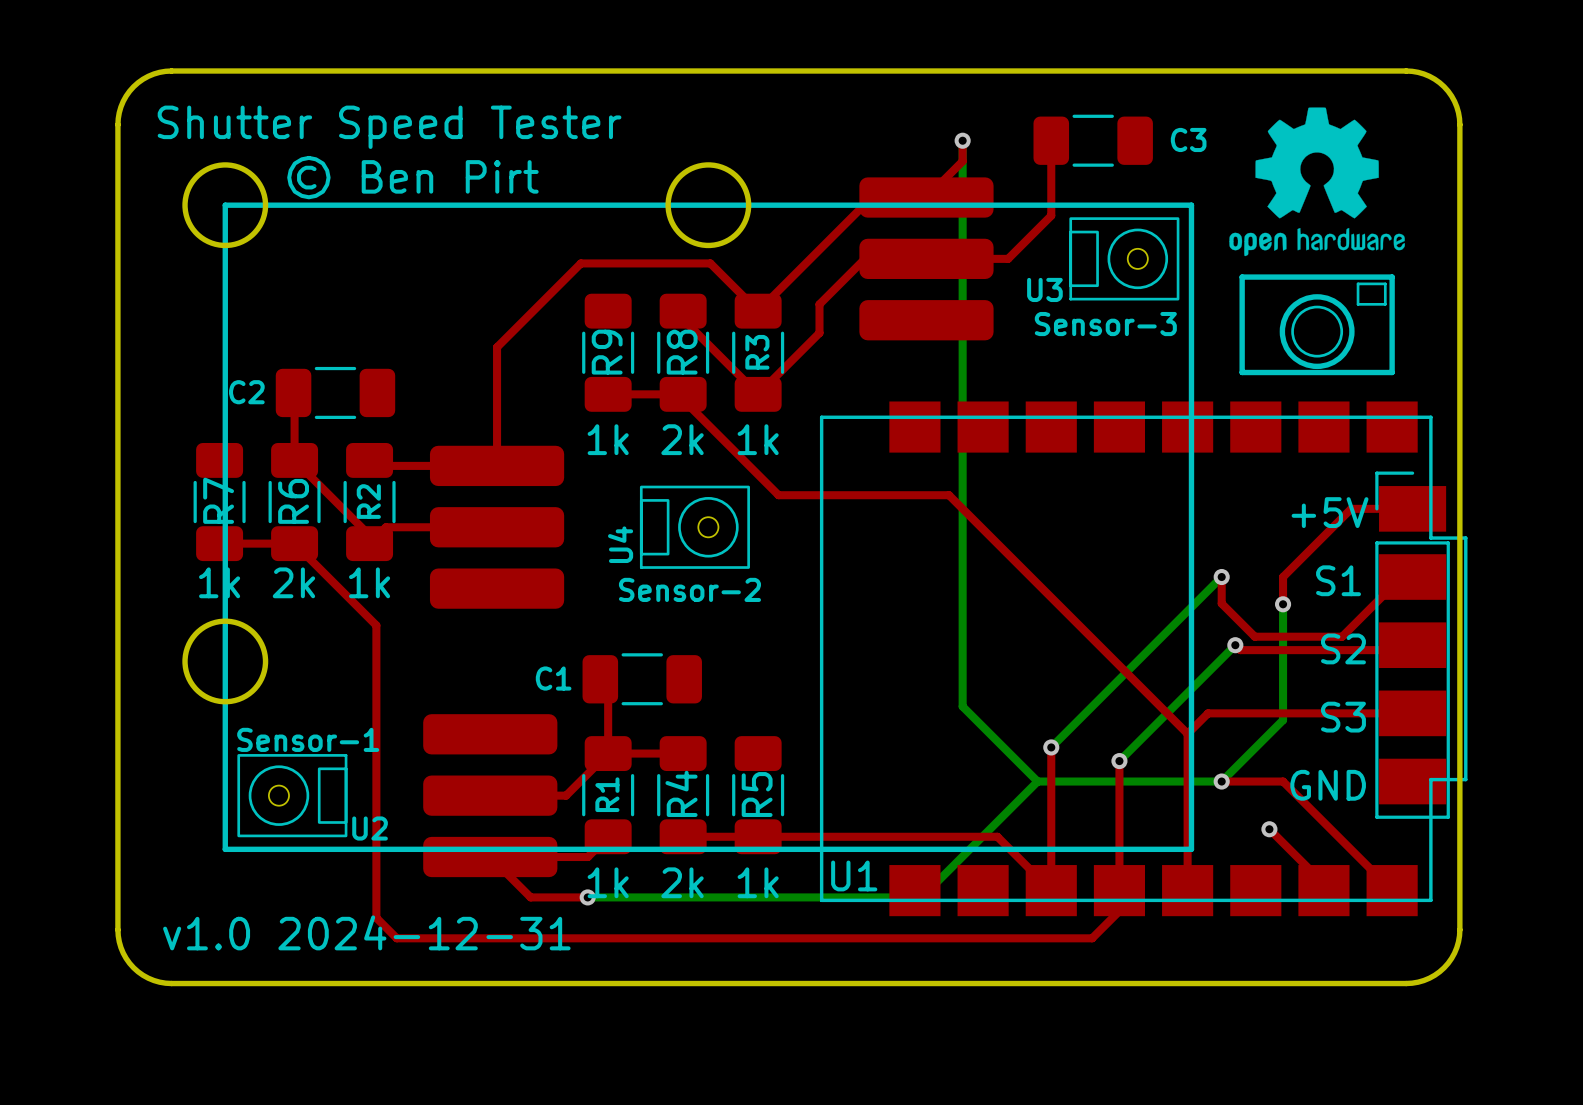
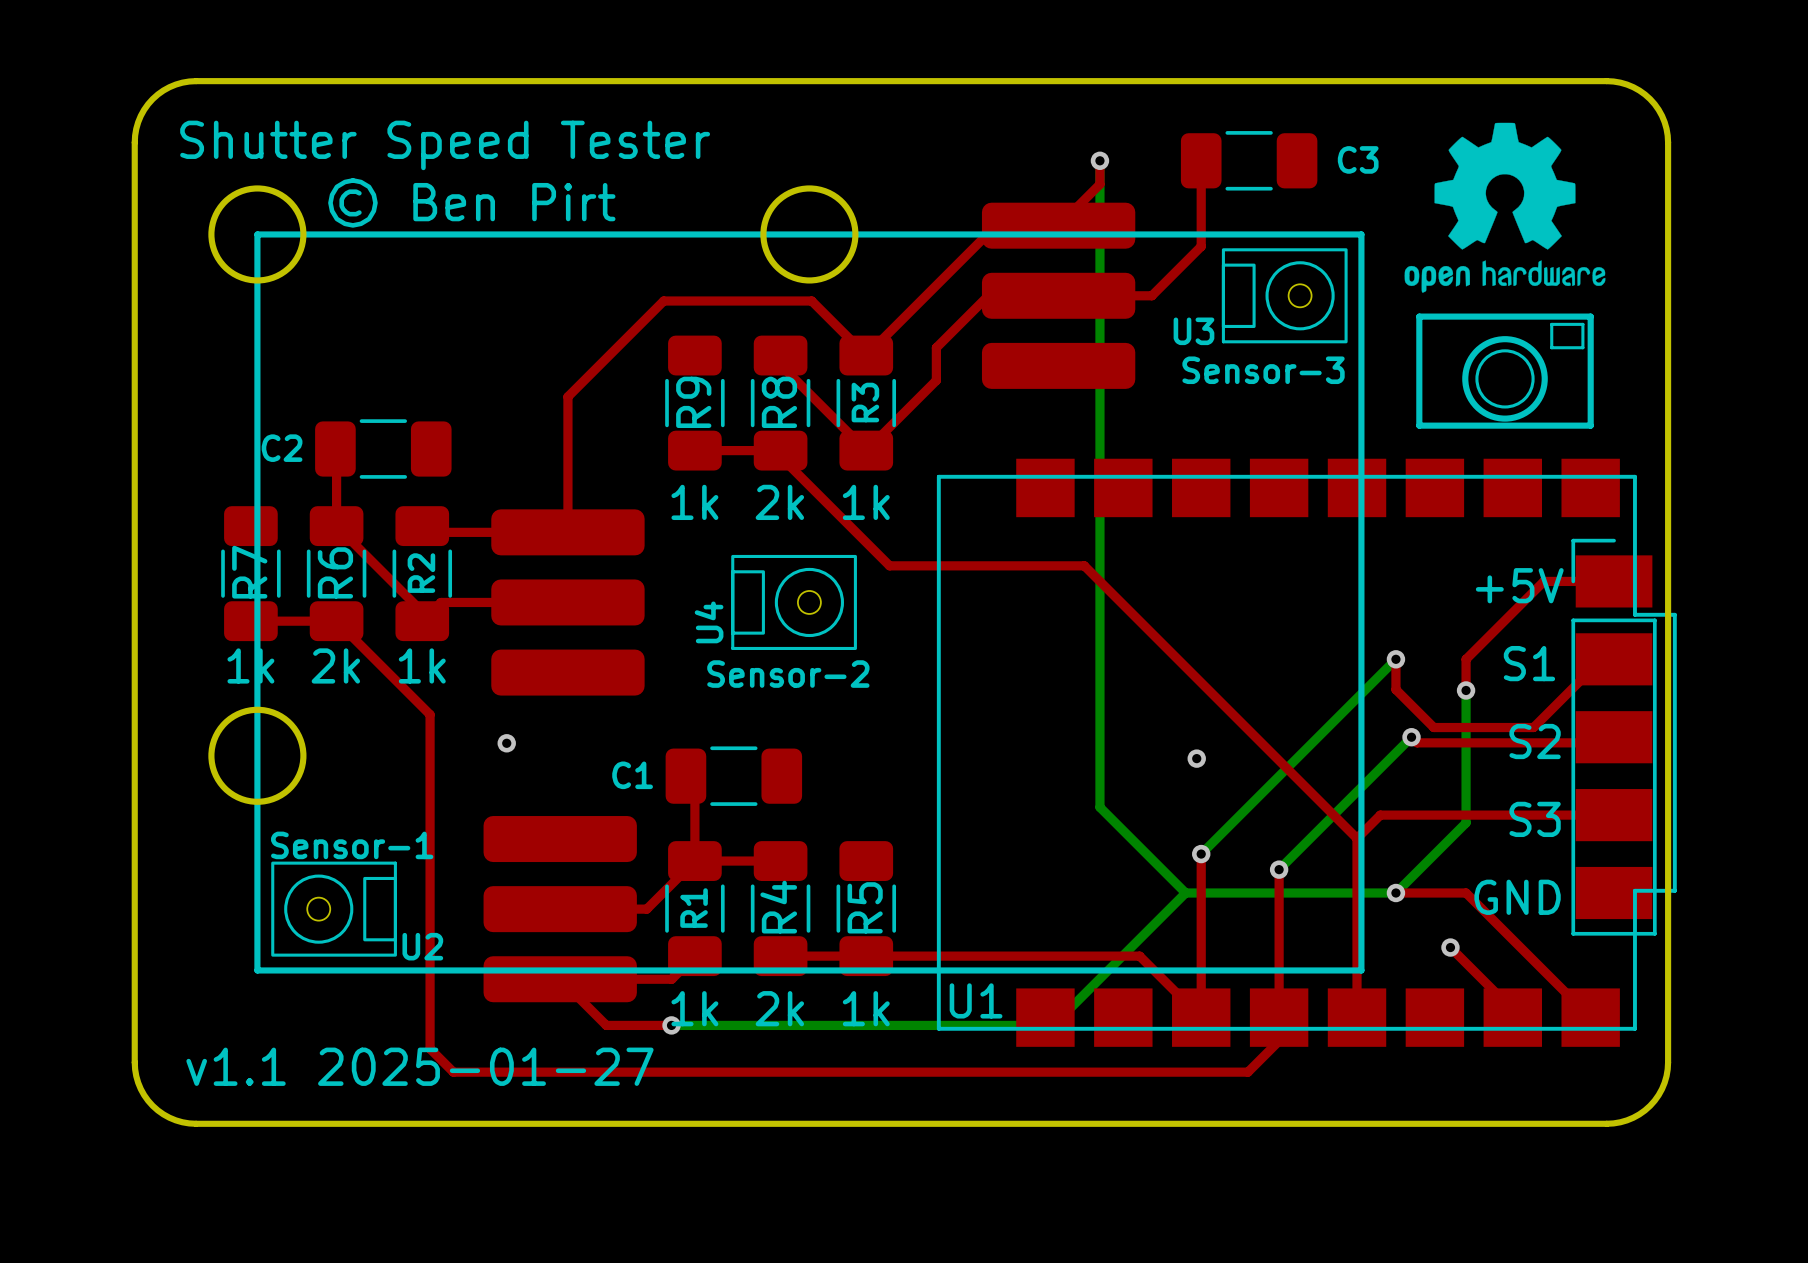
via: none -> (506, 743)
via: none -> (1196, 758)
text: v1.0 2024-12-31 (366, 932) -> v1.1 2025-01-27 (419, 1066)

